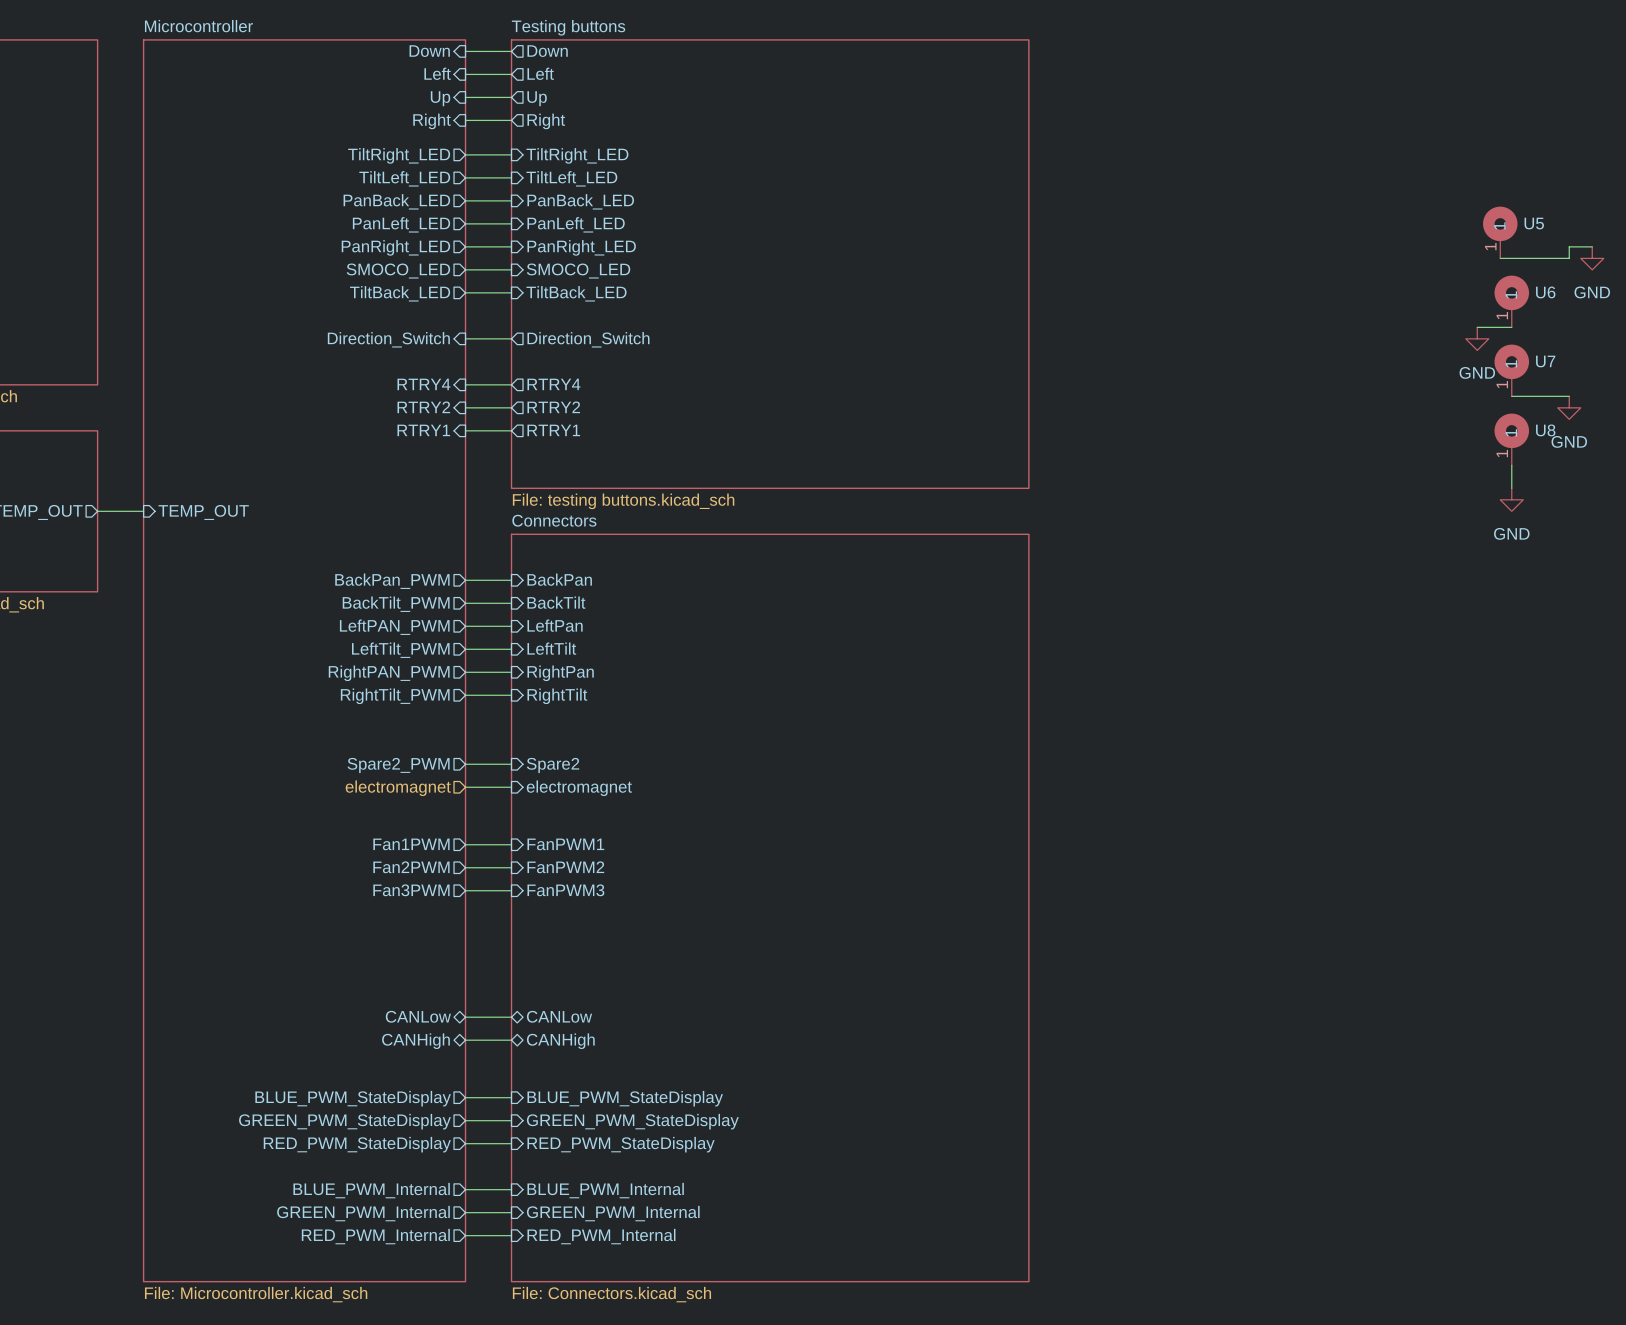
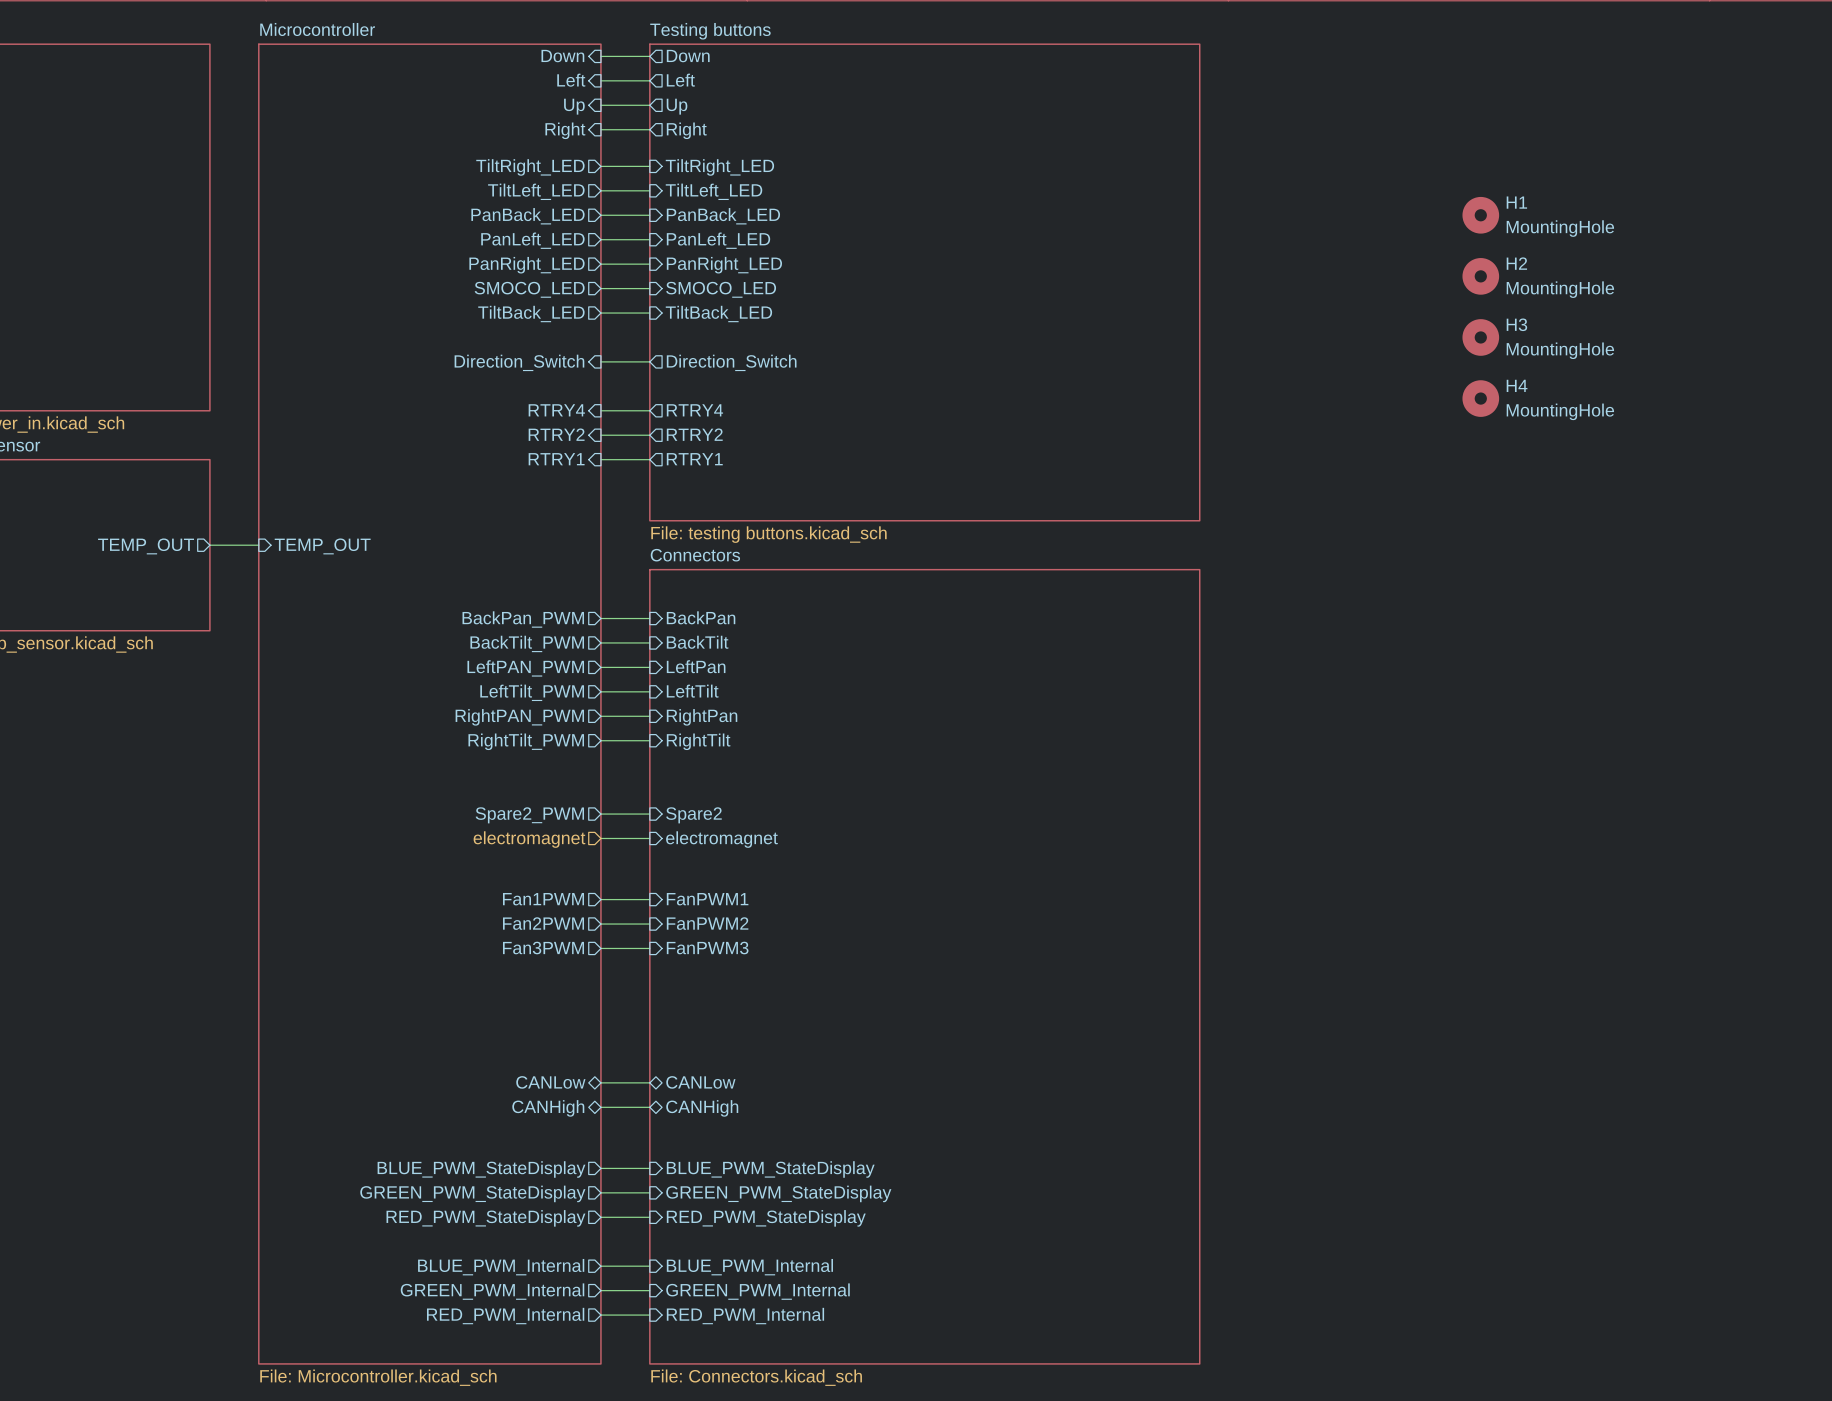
H1: none -> MountingHole (1480, 215)
U5: (1500, 232) -> none
wire: (1592, 246) (1569, 246) (1569, 258) (1500, 258) -> none
H2: none -> MountingHole (1480, 276)
power symbol: GND (1592, 258) -> none
U6: (1511, 301) -> none
H3: none -> MountingHole (1480, 337)
wire: (1477, 327) (1511, 327) -> none
power symbol: GND (1477, 338) -> none
U7: (1511, 370) -> none
H4: none -> MountingHole (1480, 398)
wire: (1511, 396) (1569, 396) -> none
power symbol: GND (1569, 407) -> none
U8: (1511, 439) -> none
wire: (1511, 465) (1511, 488) -> none
power symbol: GND (1511, 499) -> none

